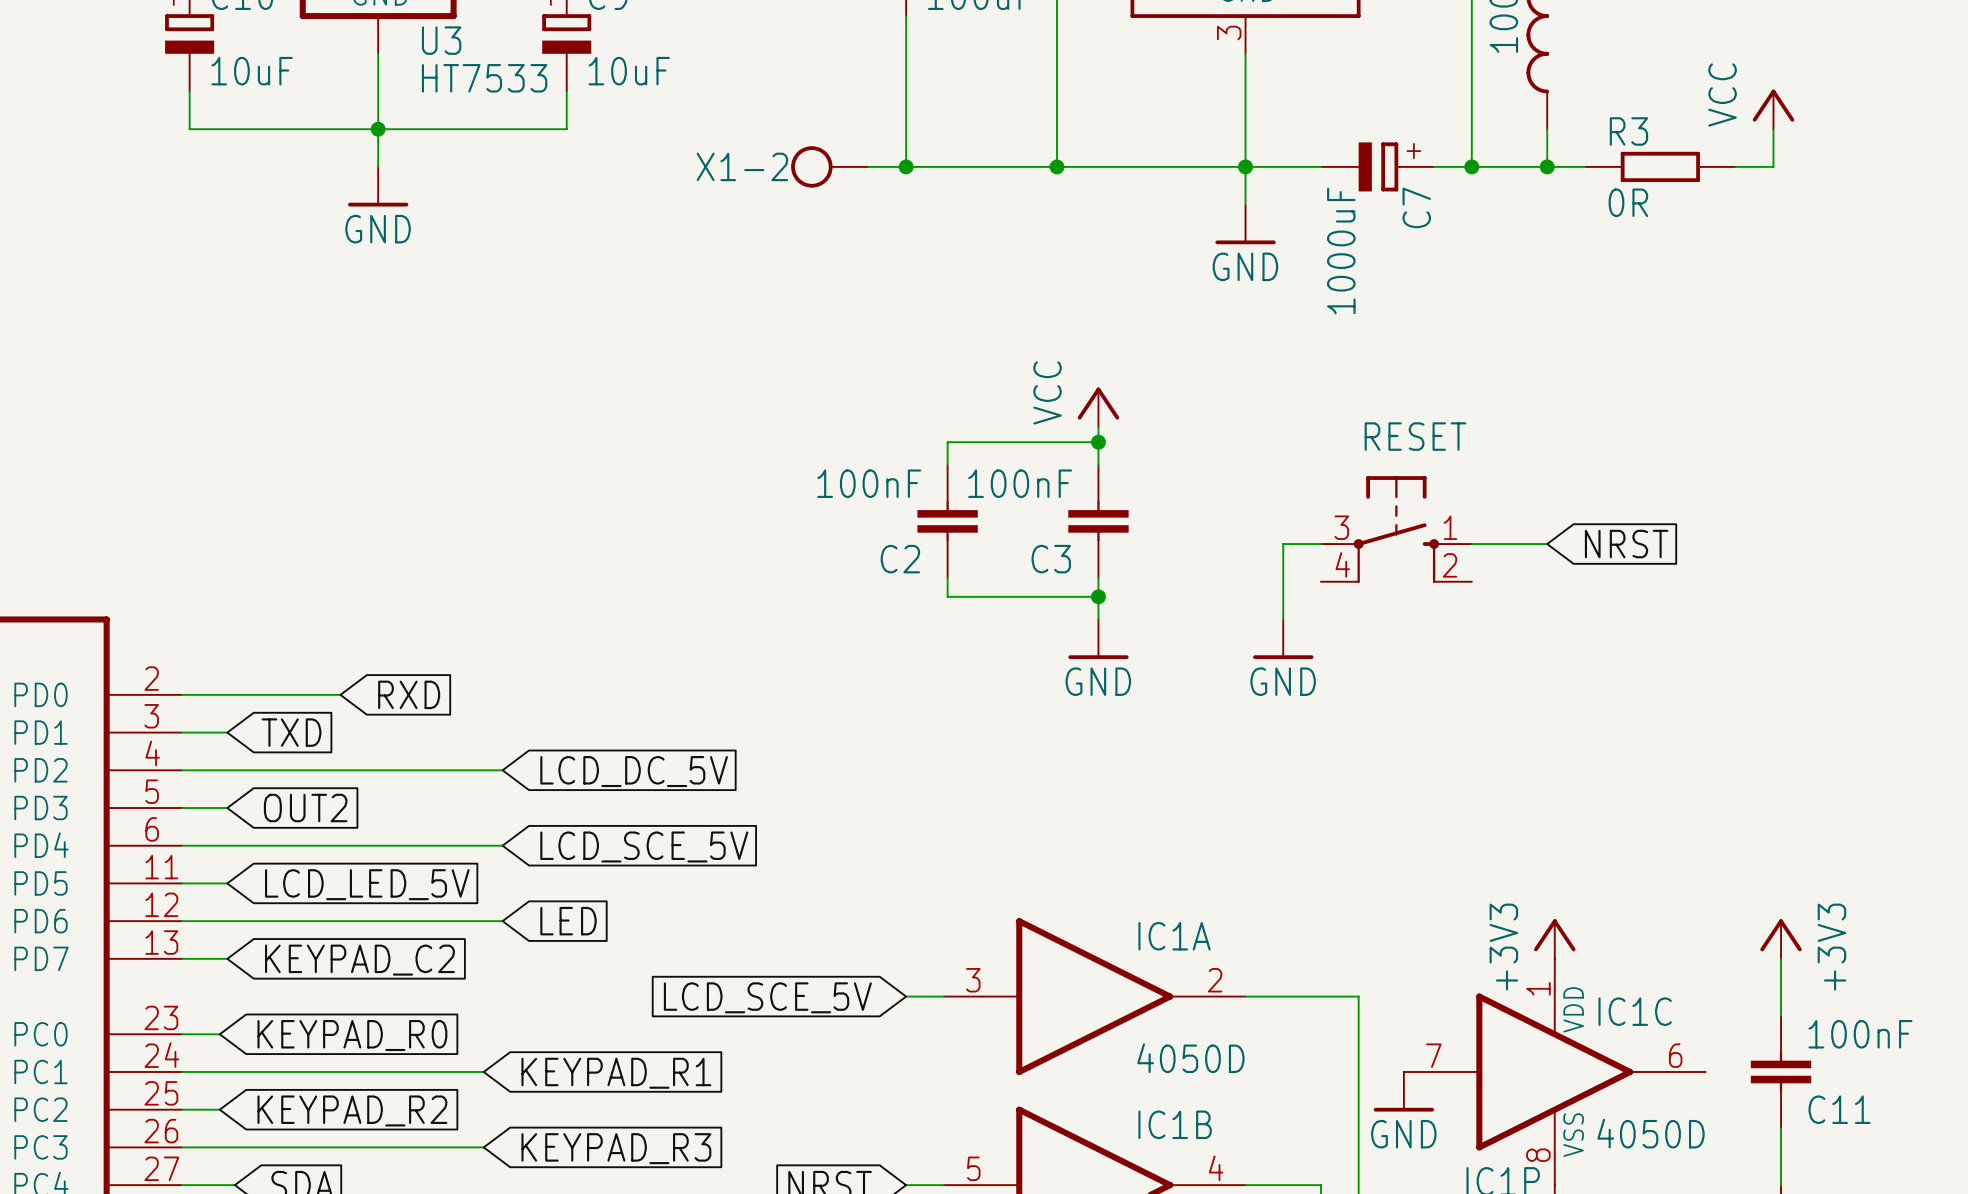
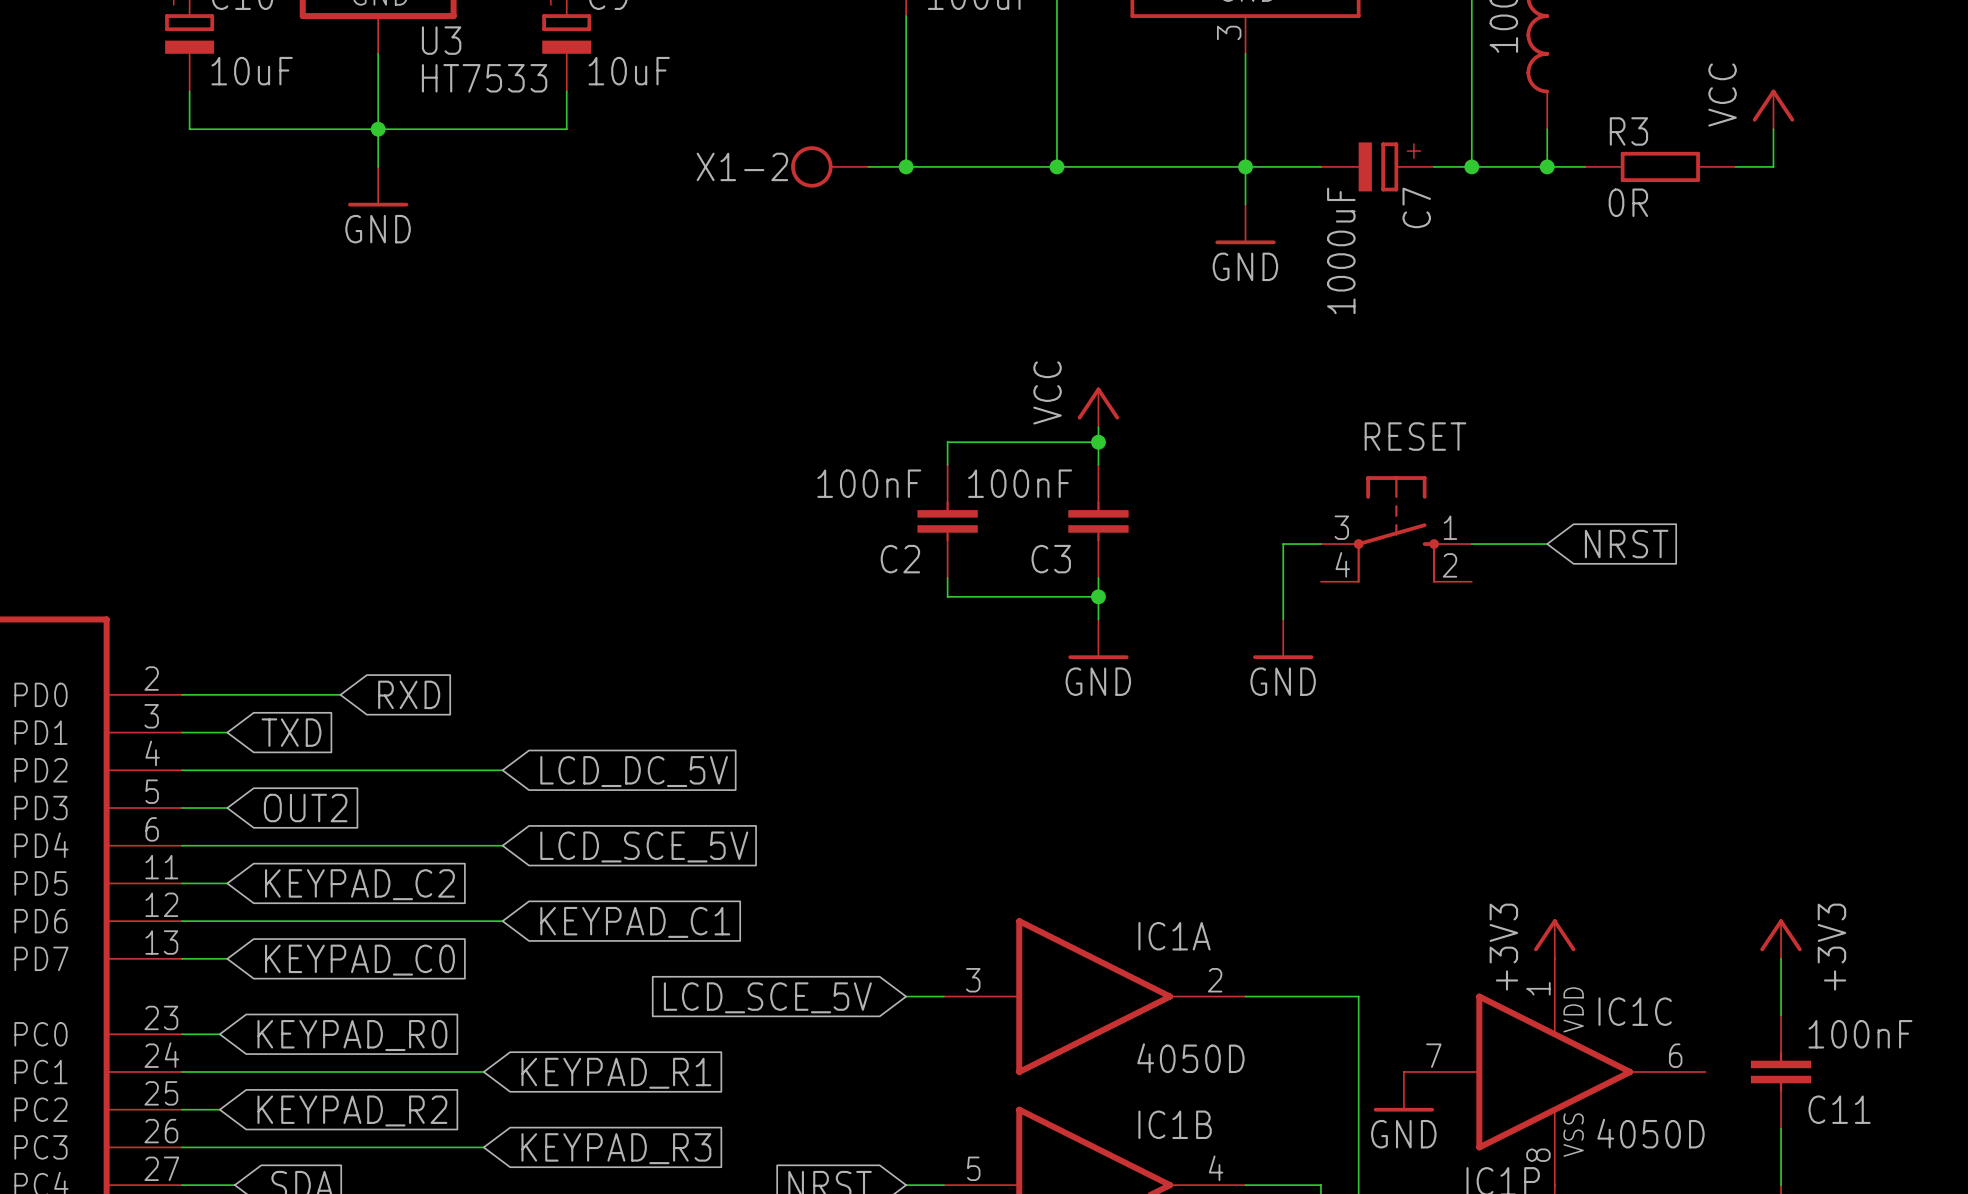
global label: LCD_LED_5V (367, 884) -> KEYPAD_C2 (359, 884)
global label: LED (568, 921) -> KEYPAD_C1 (635, 922)
global label: KEYPAD_C2 (359, 960) -> KEYPAD_C0 (359, 960)

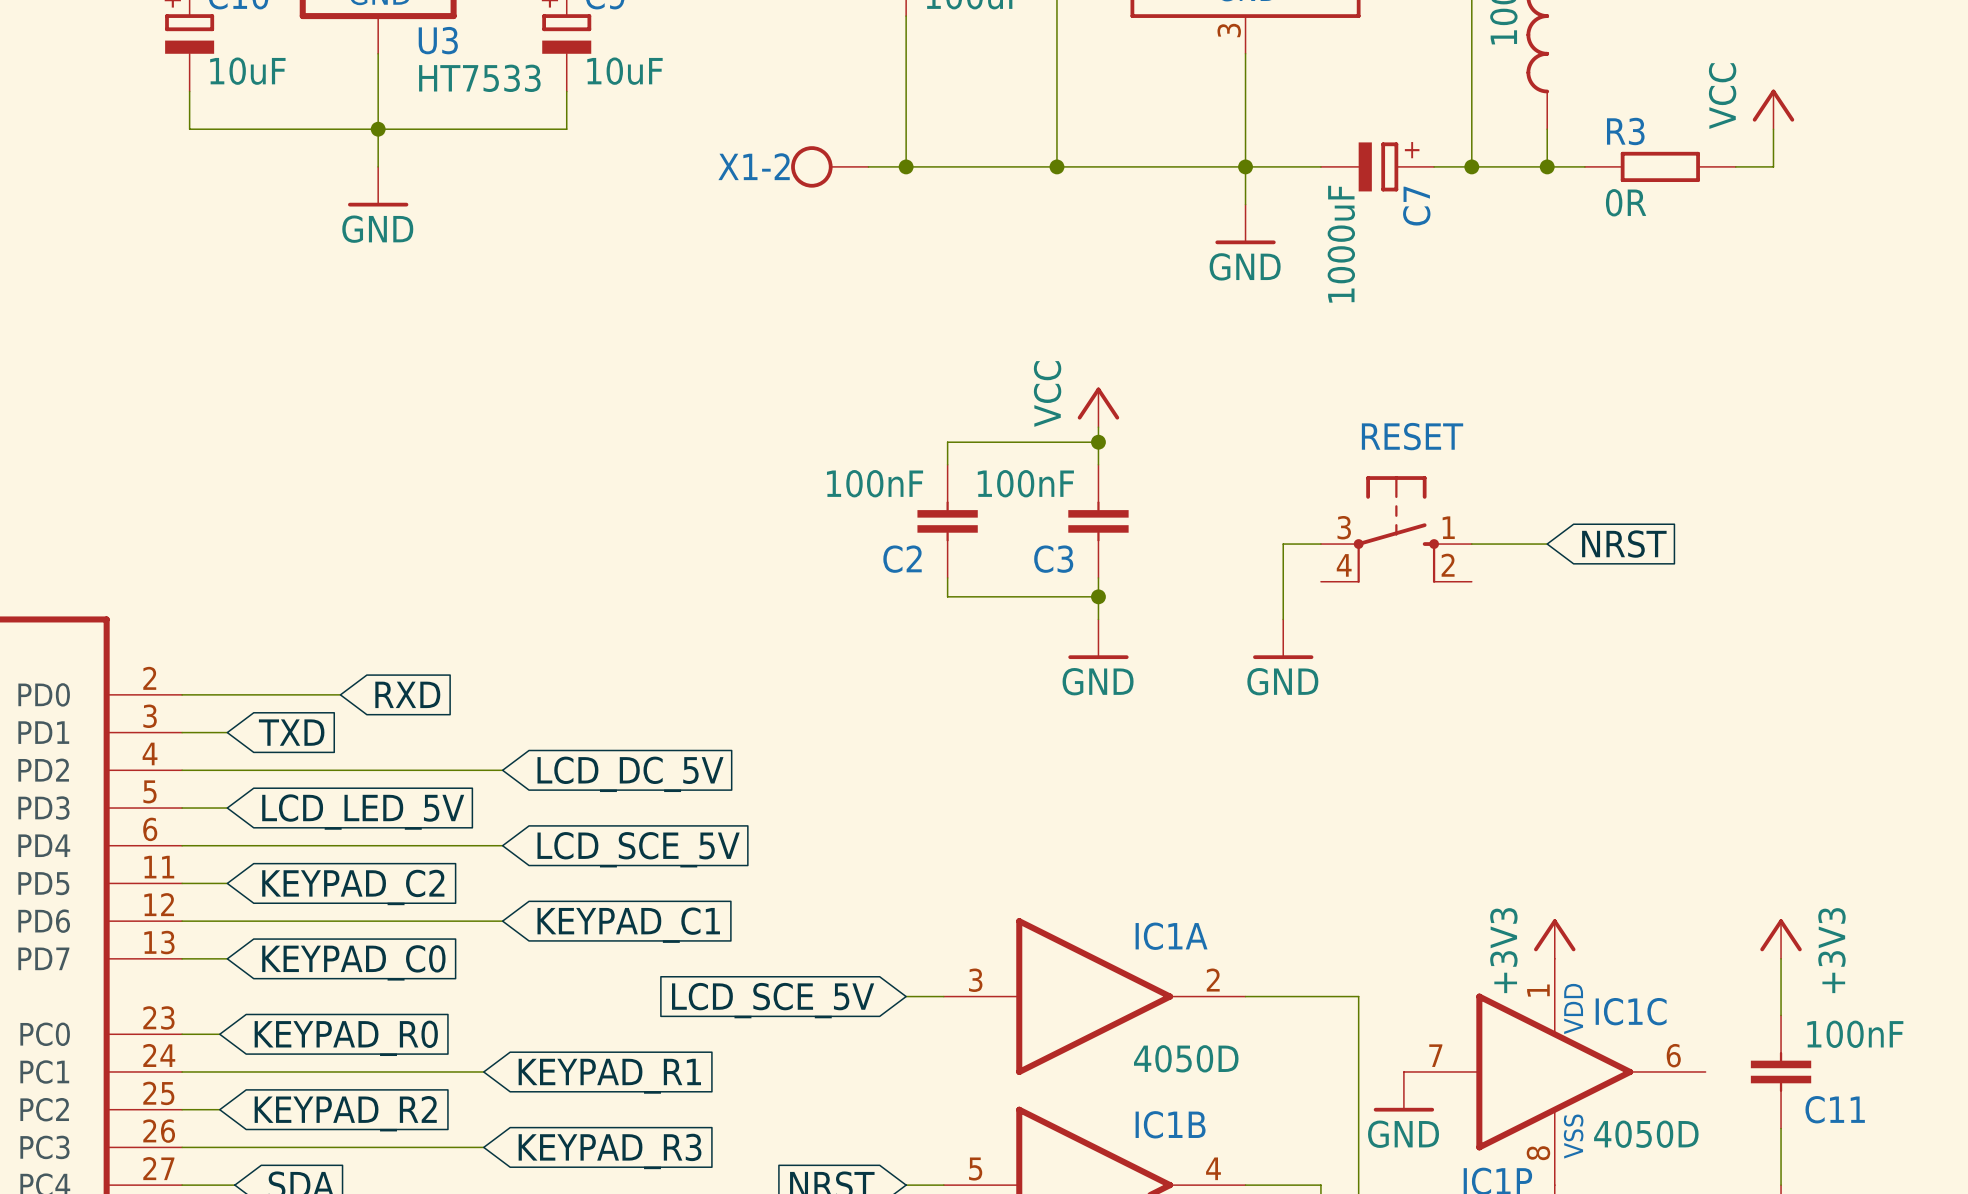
global label: OUT2 (305, 808) -> LCD_LED_5V (363, 812)

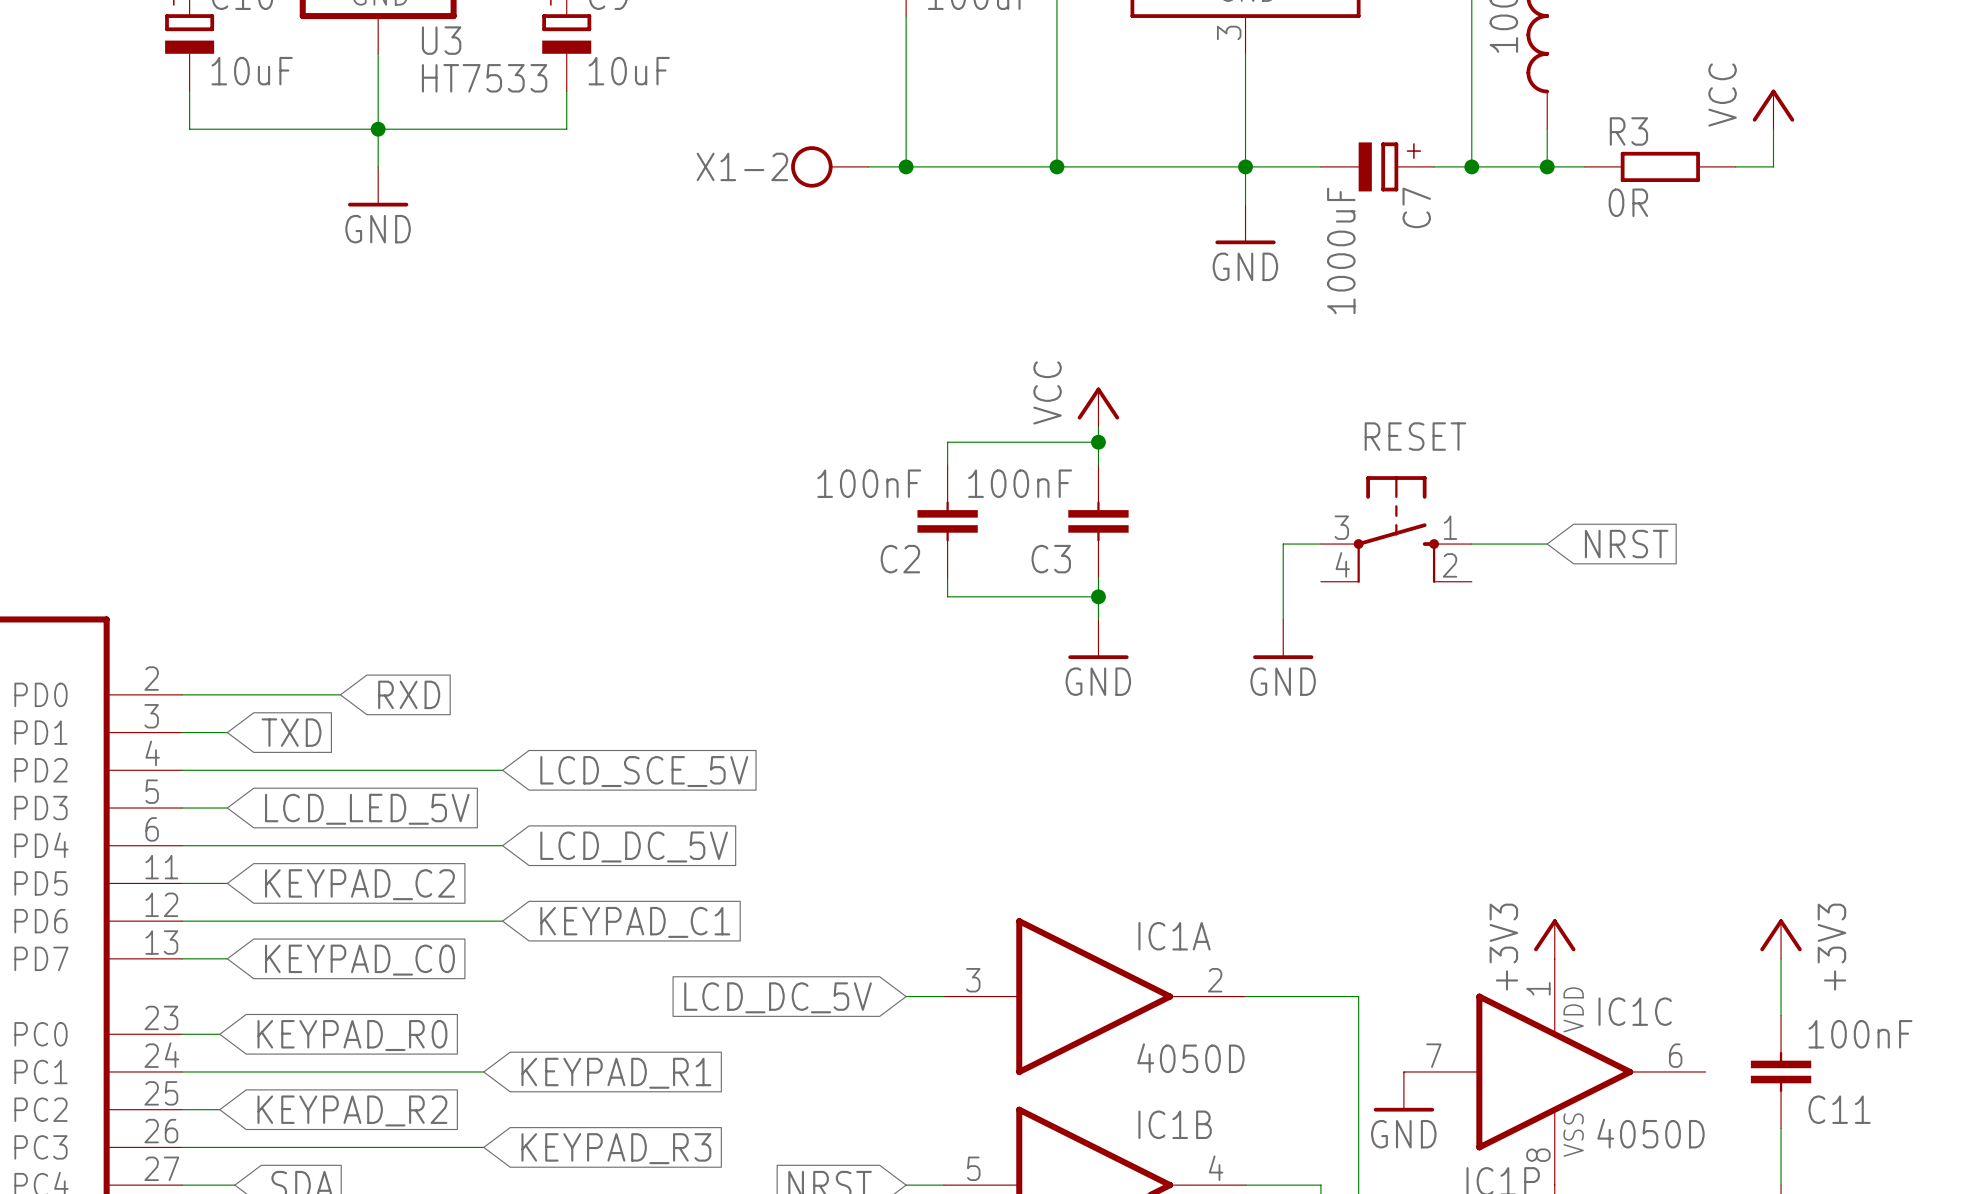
global label: LCD_DC_5V (630, 774) -> LCD_SCE_5V (644, 771)
global label: LCD_SCE_5V (638, 849) -> LCD_DC_5V (634, 846)
global label: LCD_SCE_5V (773, 1000) -> LCD_DC_5V (778, 997)

